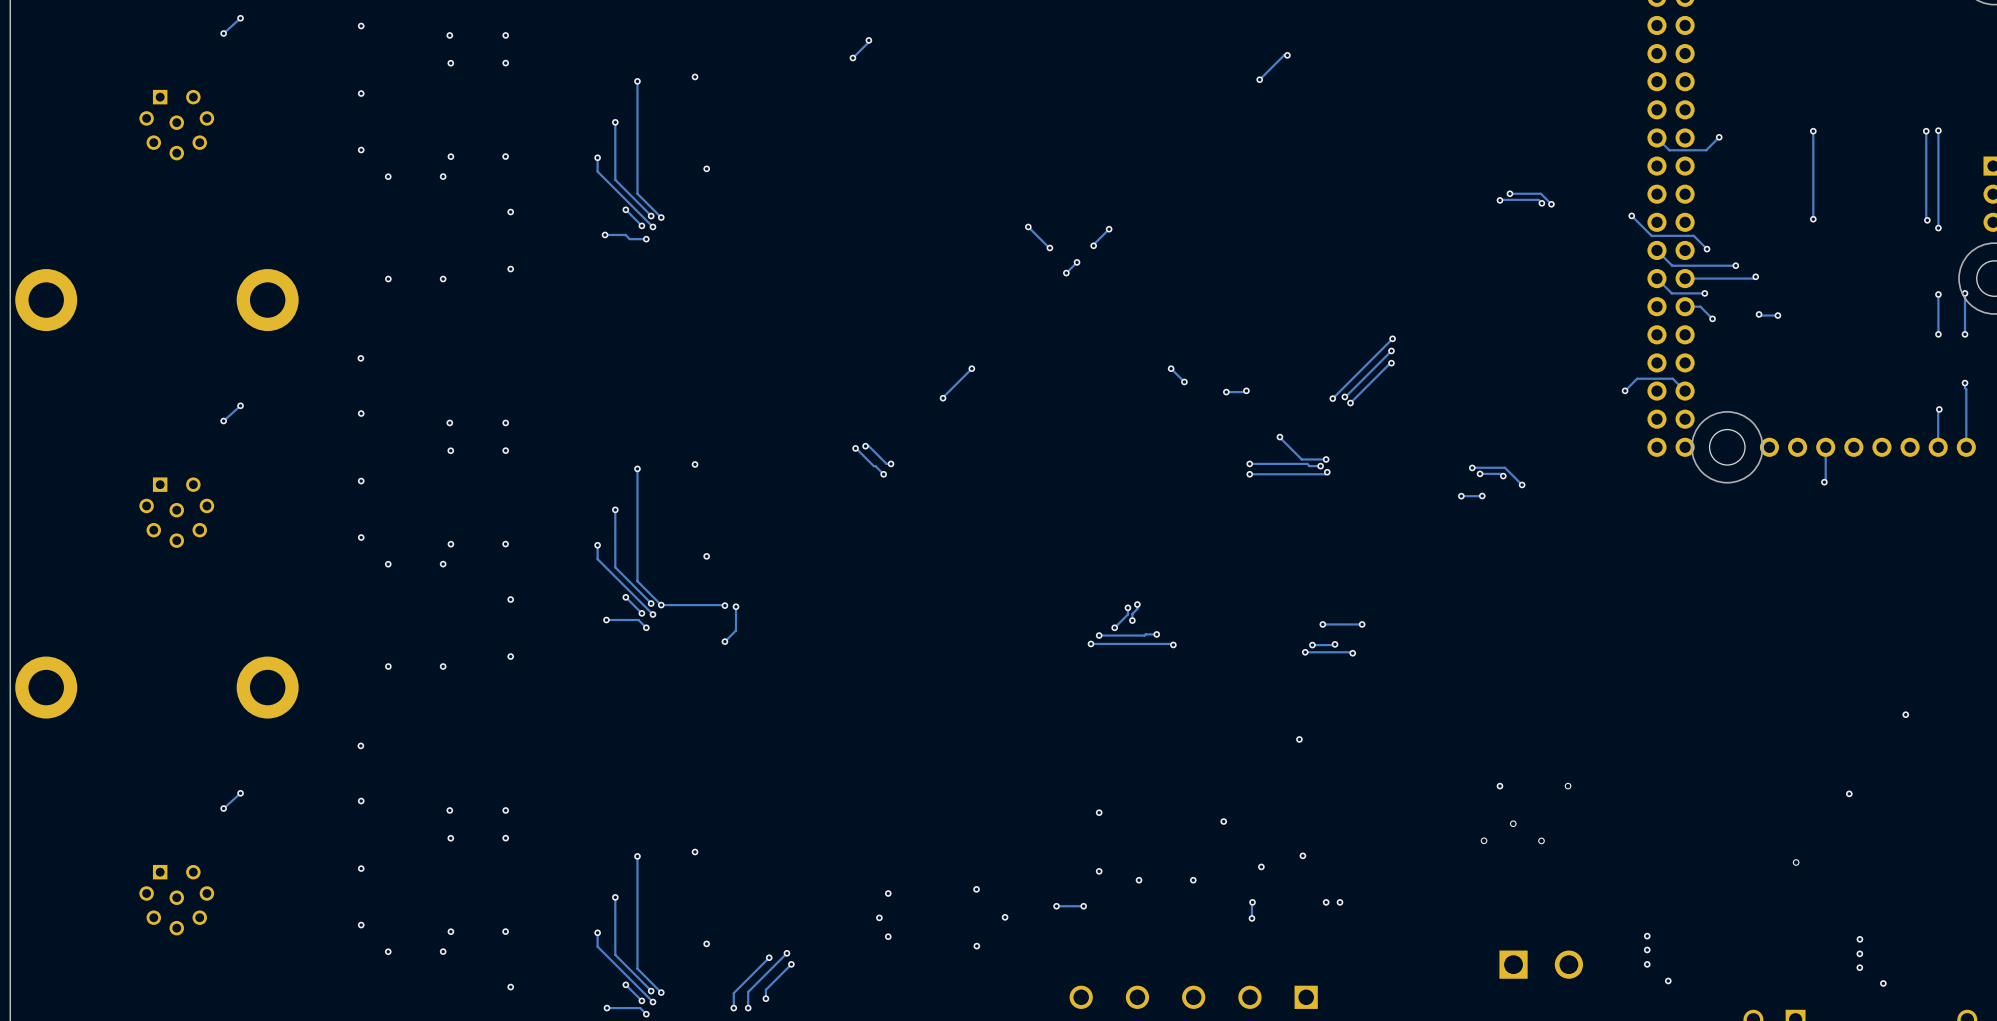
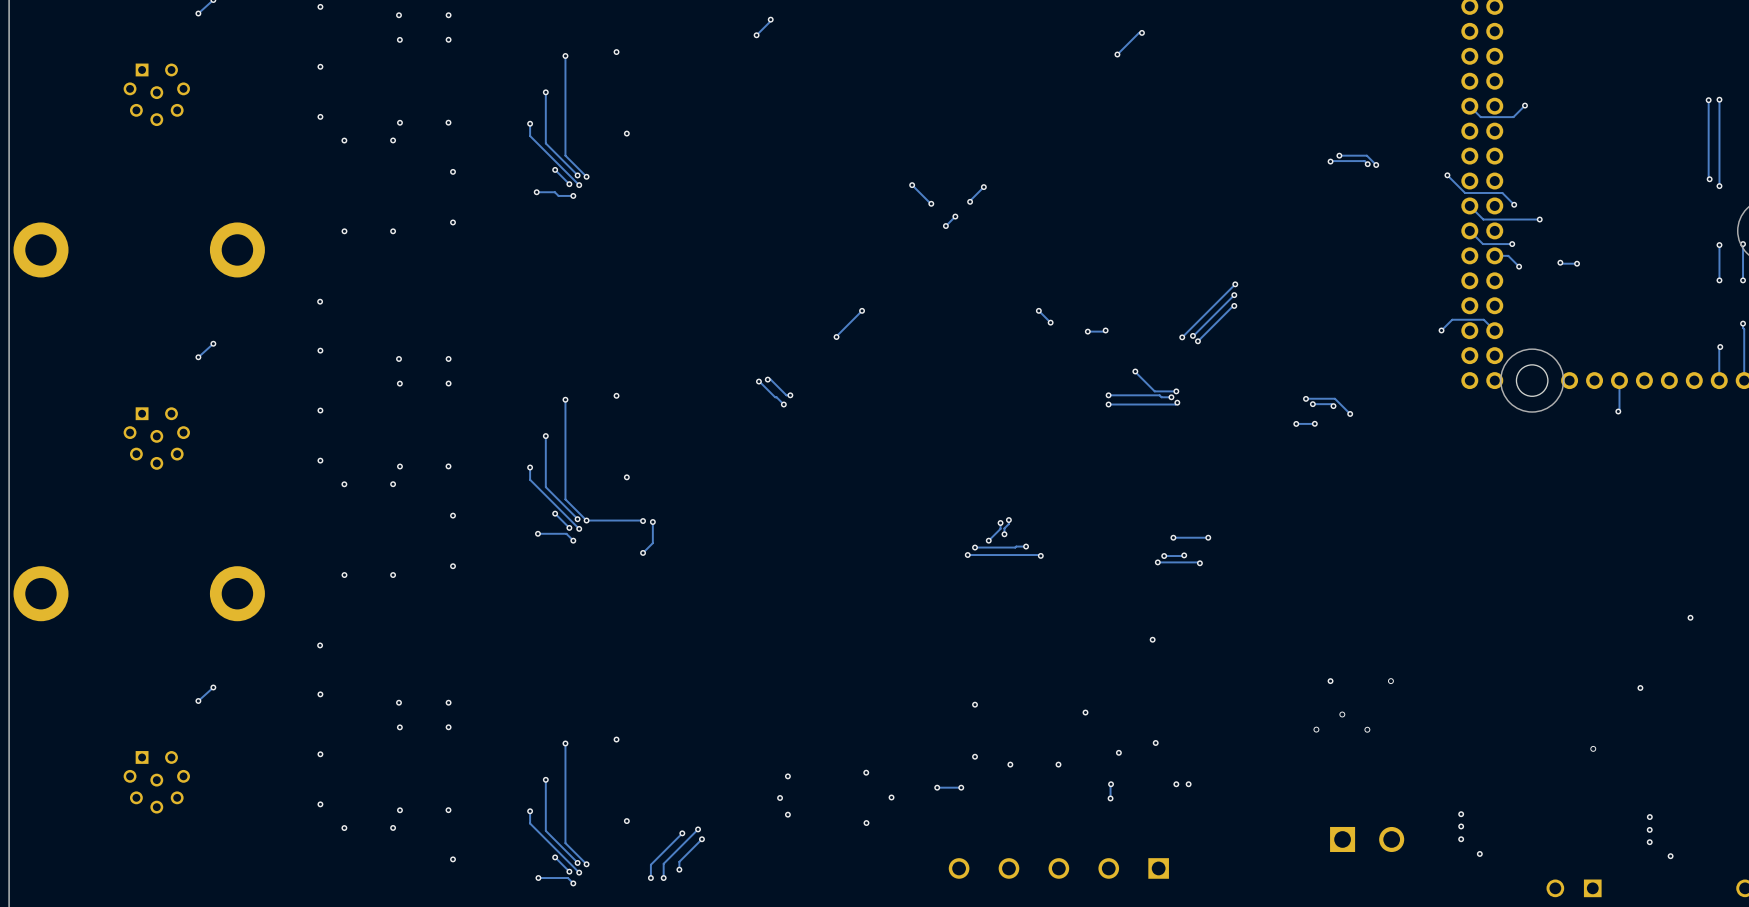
track: (1813, 131) (1813, 219) -> none
via: (1813, 131) -> none
via: (1813, 219) -> none
track: (1755, 276) (1753, 278) (1685, 278) -> none
via: (1755, 276) -> none

